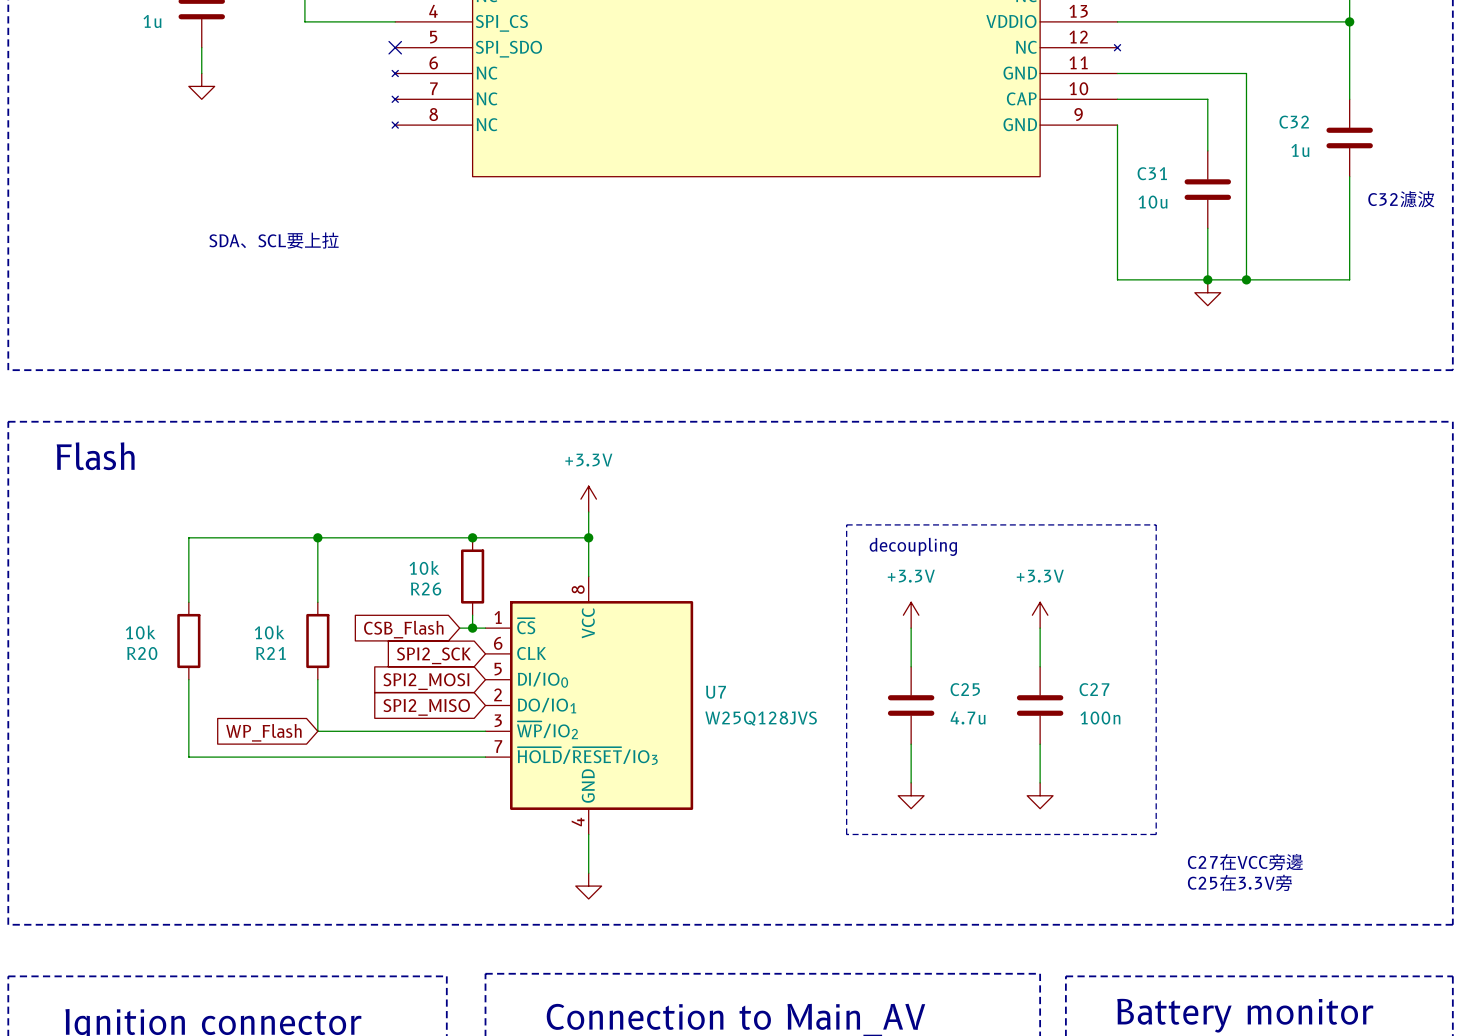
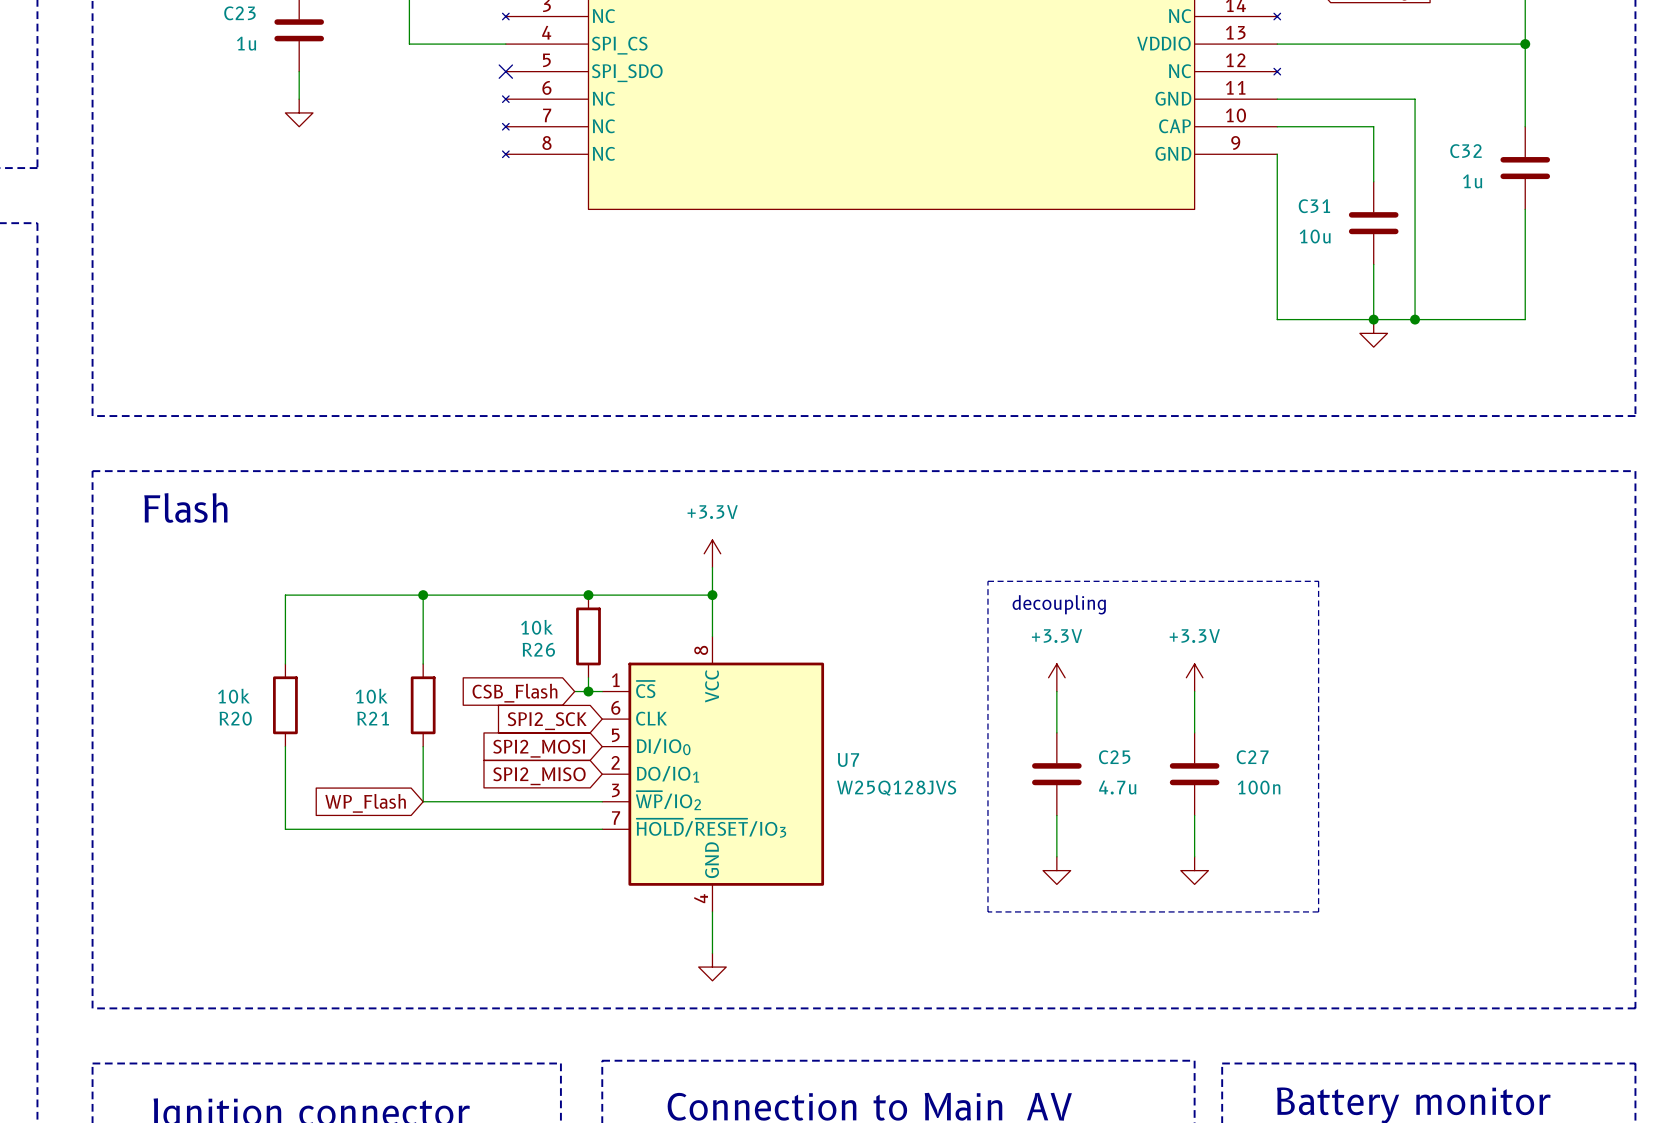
text: C32濾波 (1401, 199) -> none
text: SDA、SCL要上拉 (274, 240) -> none
text: C27在VCC旁邊 (1245, 862) -> none
text: C25在3.3V旁 (1239, 882) -> none

